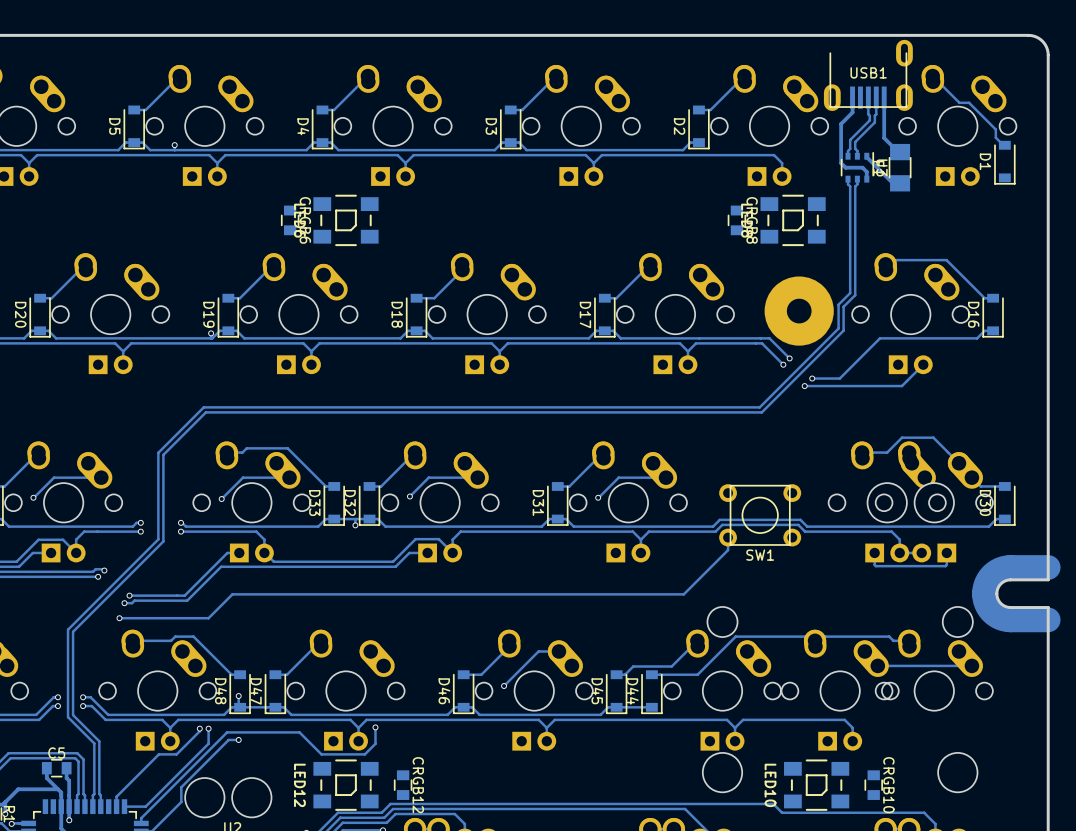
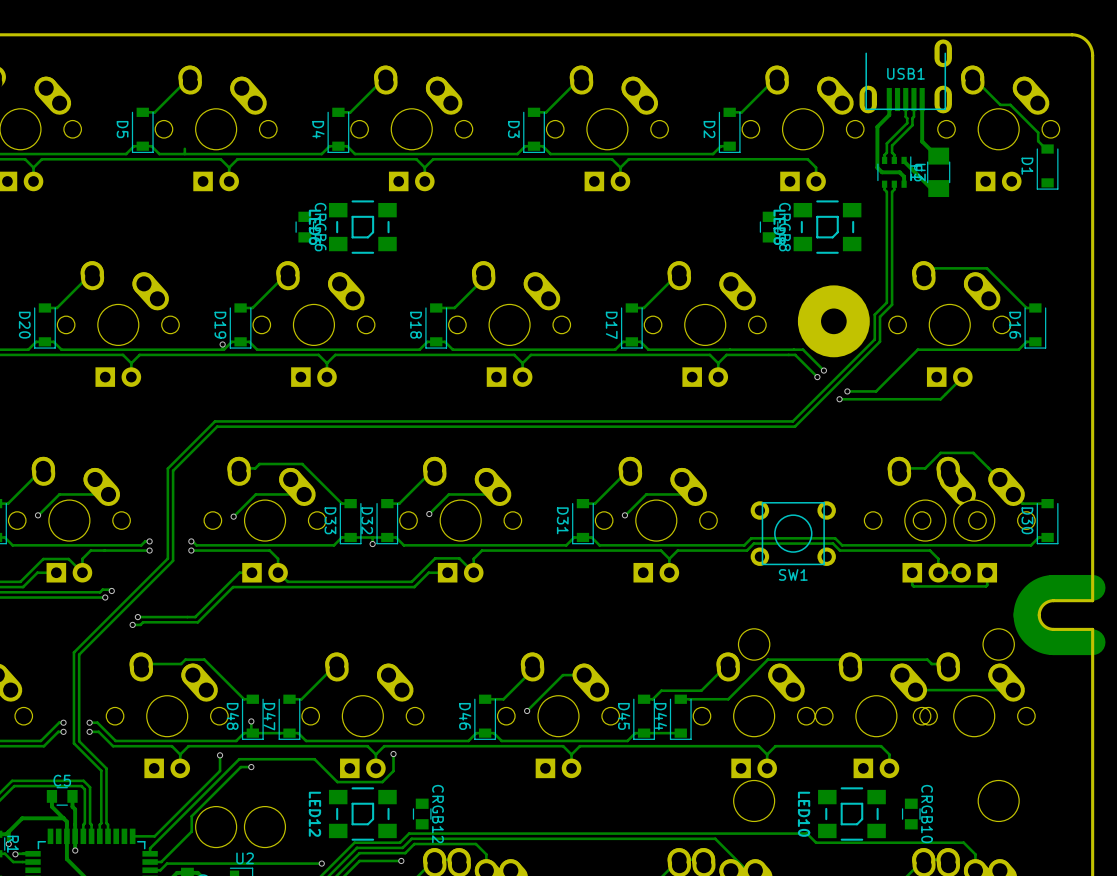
via: (174, 145) -> none
track: (728, 537) (728, 550) (683, 594) (232, 594) (208, 618) (119, 618) -> none
via: (119, 618) -> none
track: (199, 728) (199, 731) (176, 754) (158, 754) (116, 796) (116, 806) -> none
via: (199, 728) -> none

